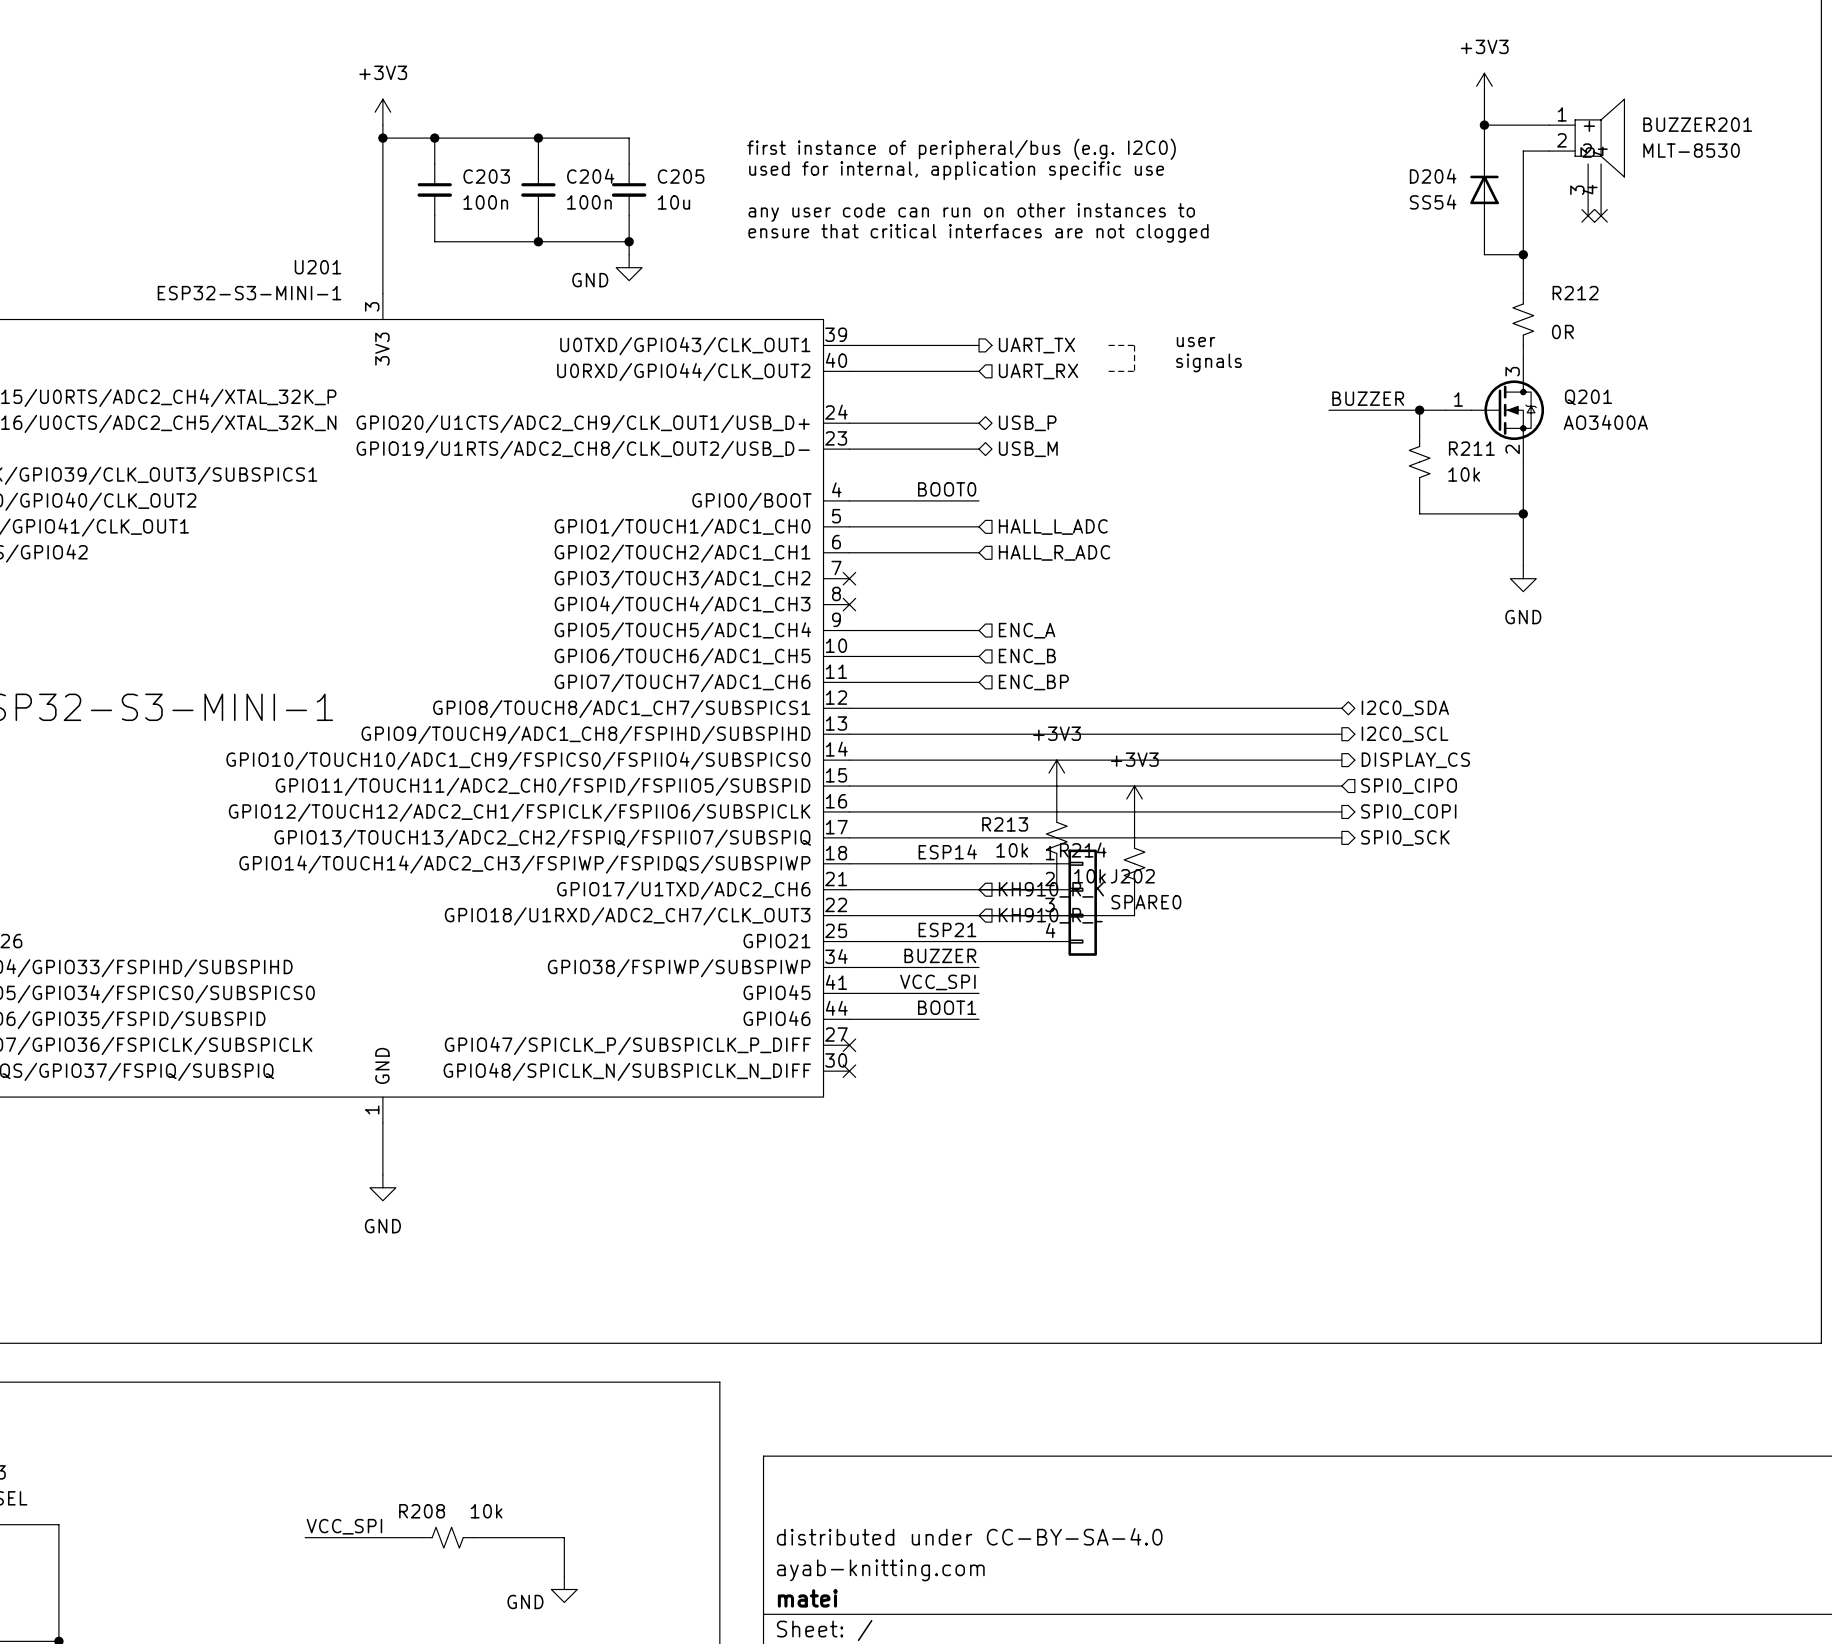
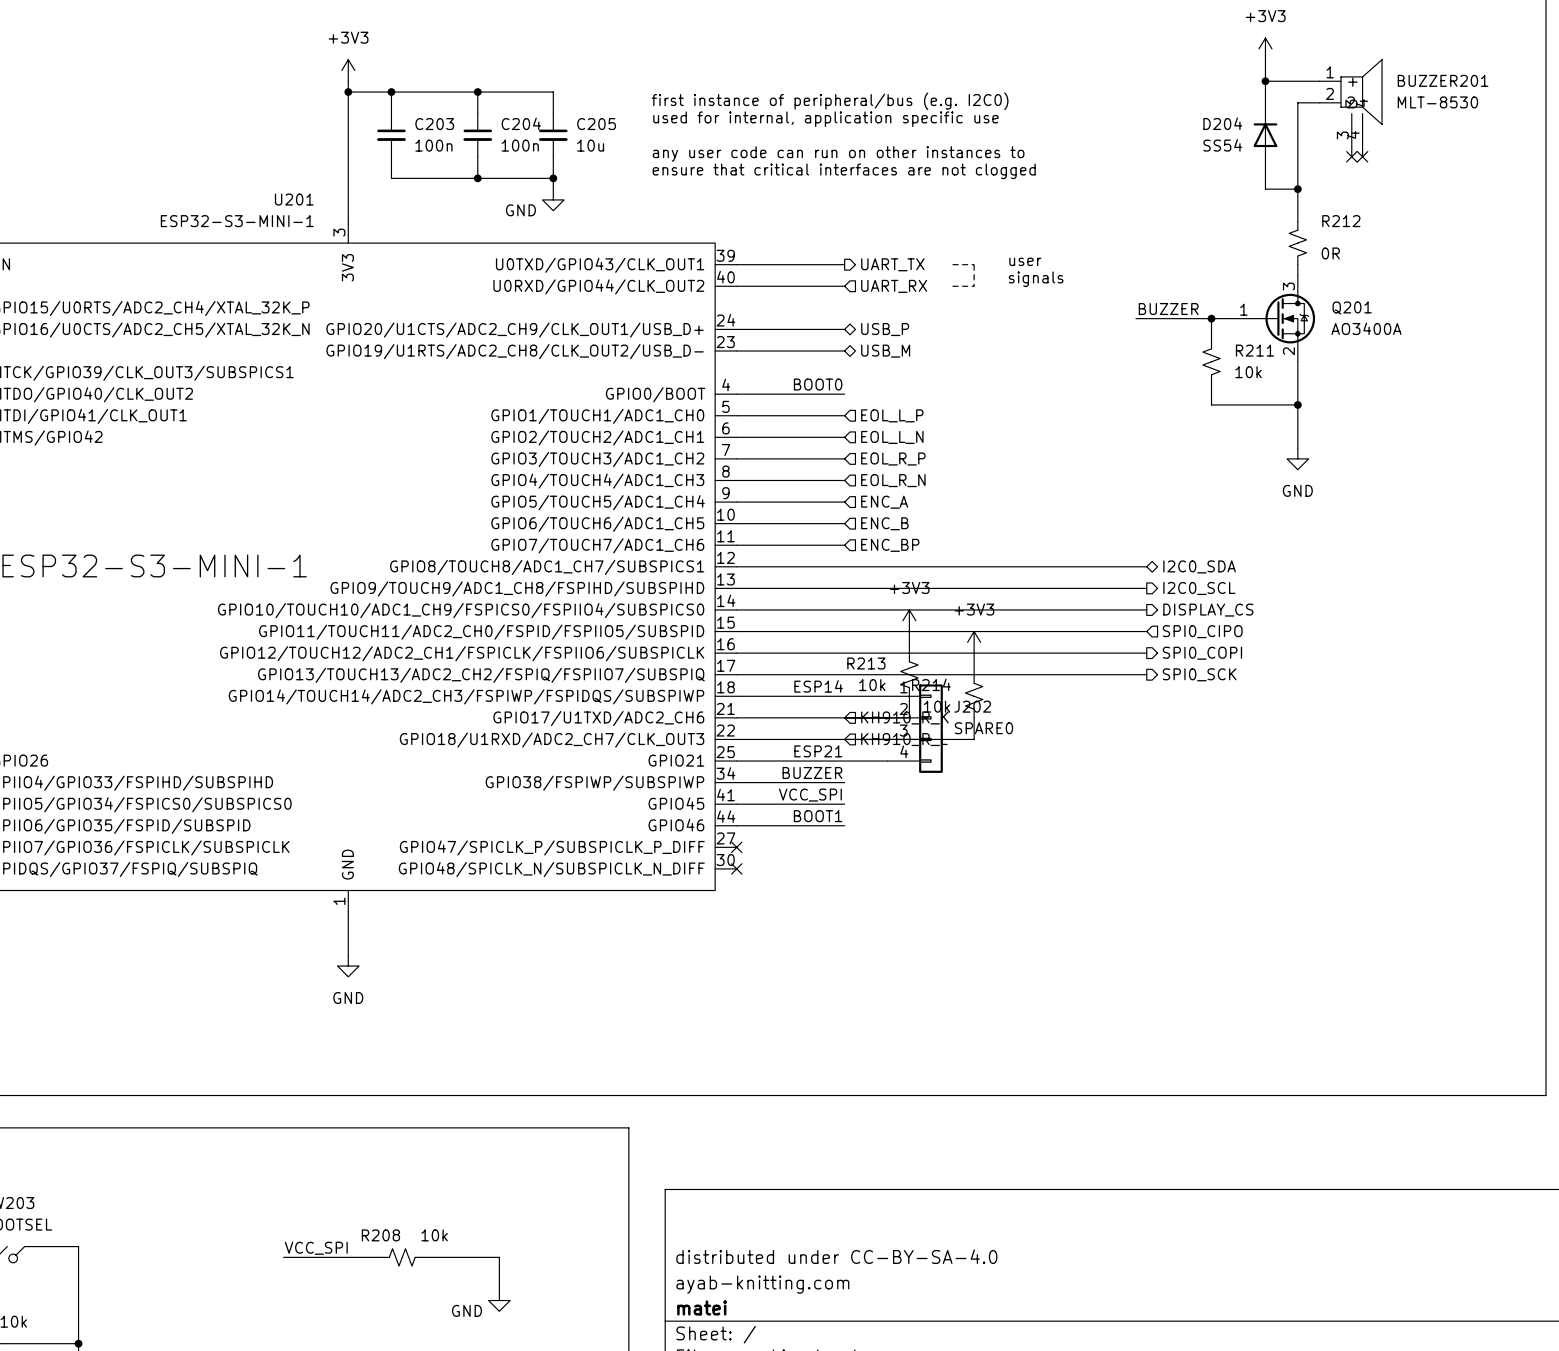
hierarchical label: HALL_L_ADC (1053, 526) -> EOL_L_P (892, 415)
hierarchical label: HALL_R_ADC (1054, 552) -> EOL_L_N (892, 437)
wire: none -> (736, 458) (844, 458)
no-connect mark: (849, 578) -> none
hierarchical label: none -> EOL_R_P (893, 459)
wire: none -> (736, 480) (844, 480)
no-connect mark: (849, 604) -> none
hierarchical label: none -> EOL_R_N (893, 480)

